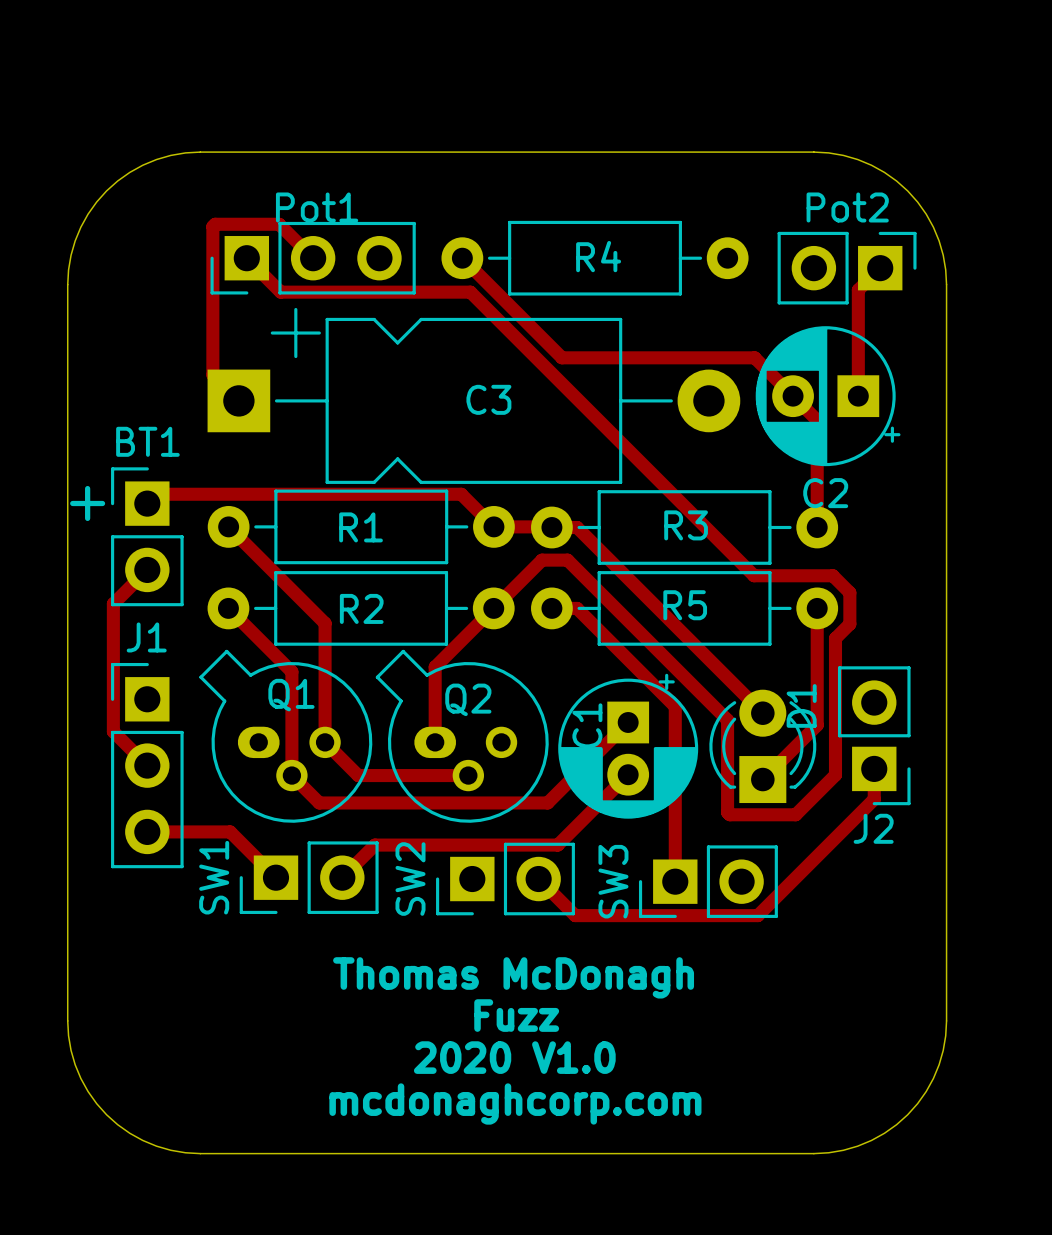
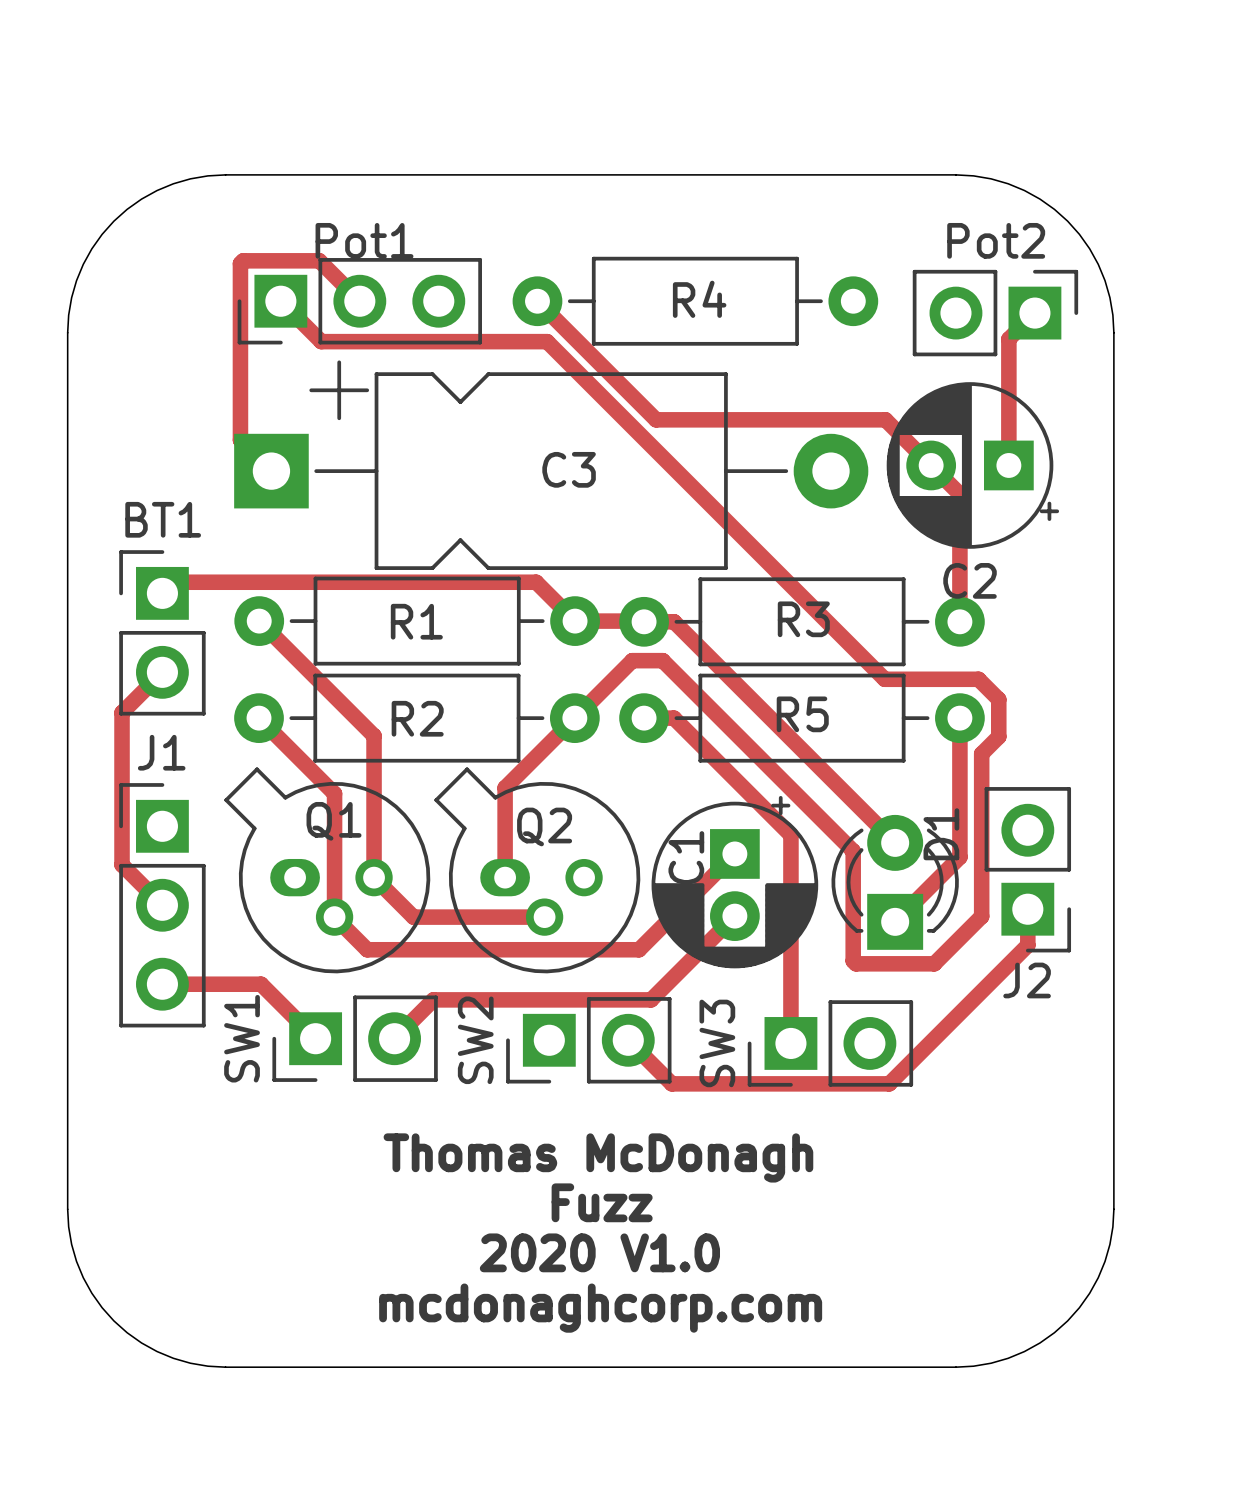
text: + (87, 503) -> none

